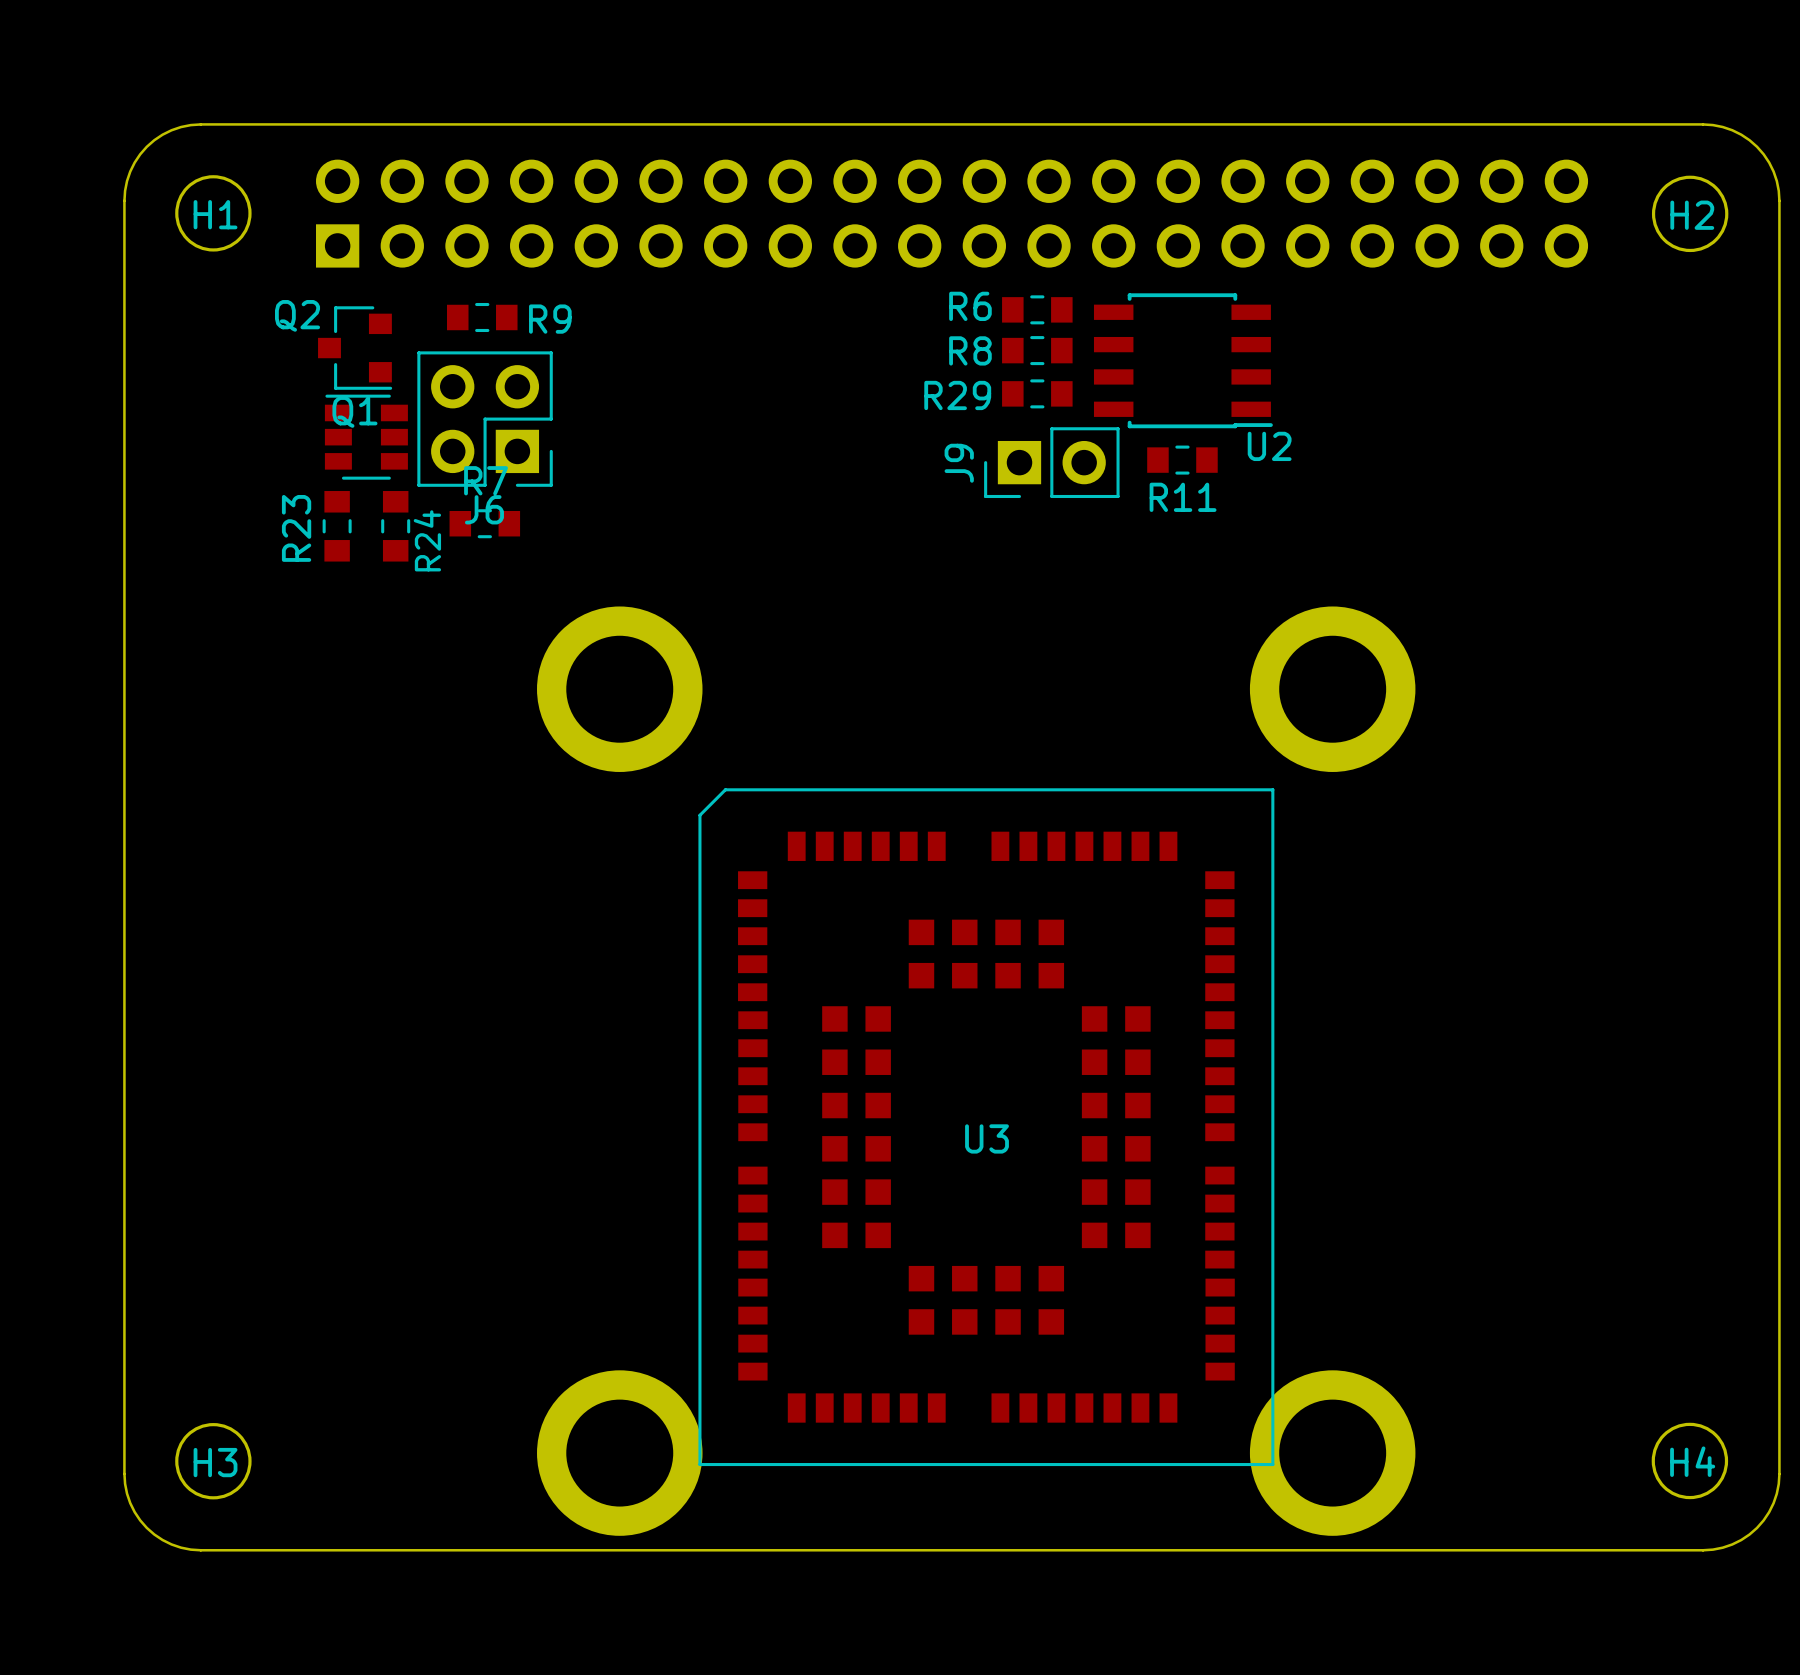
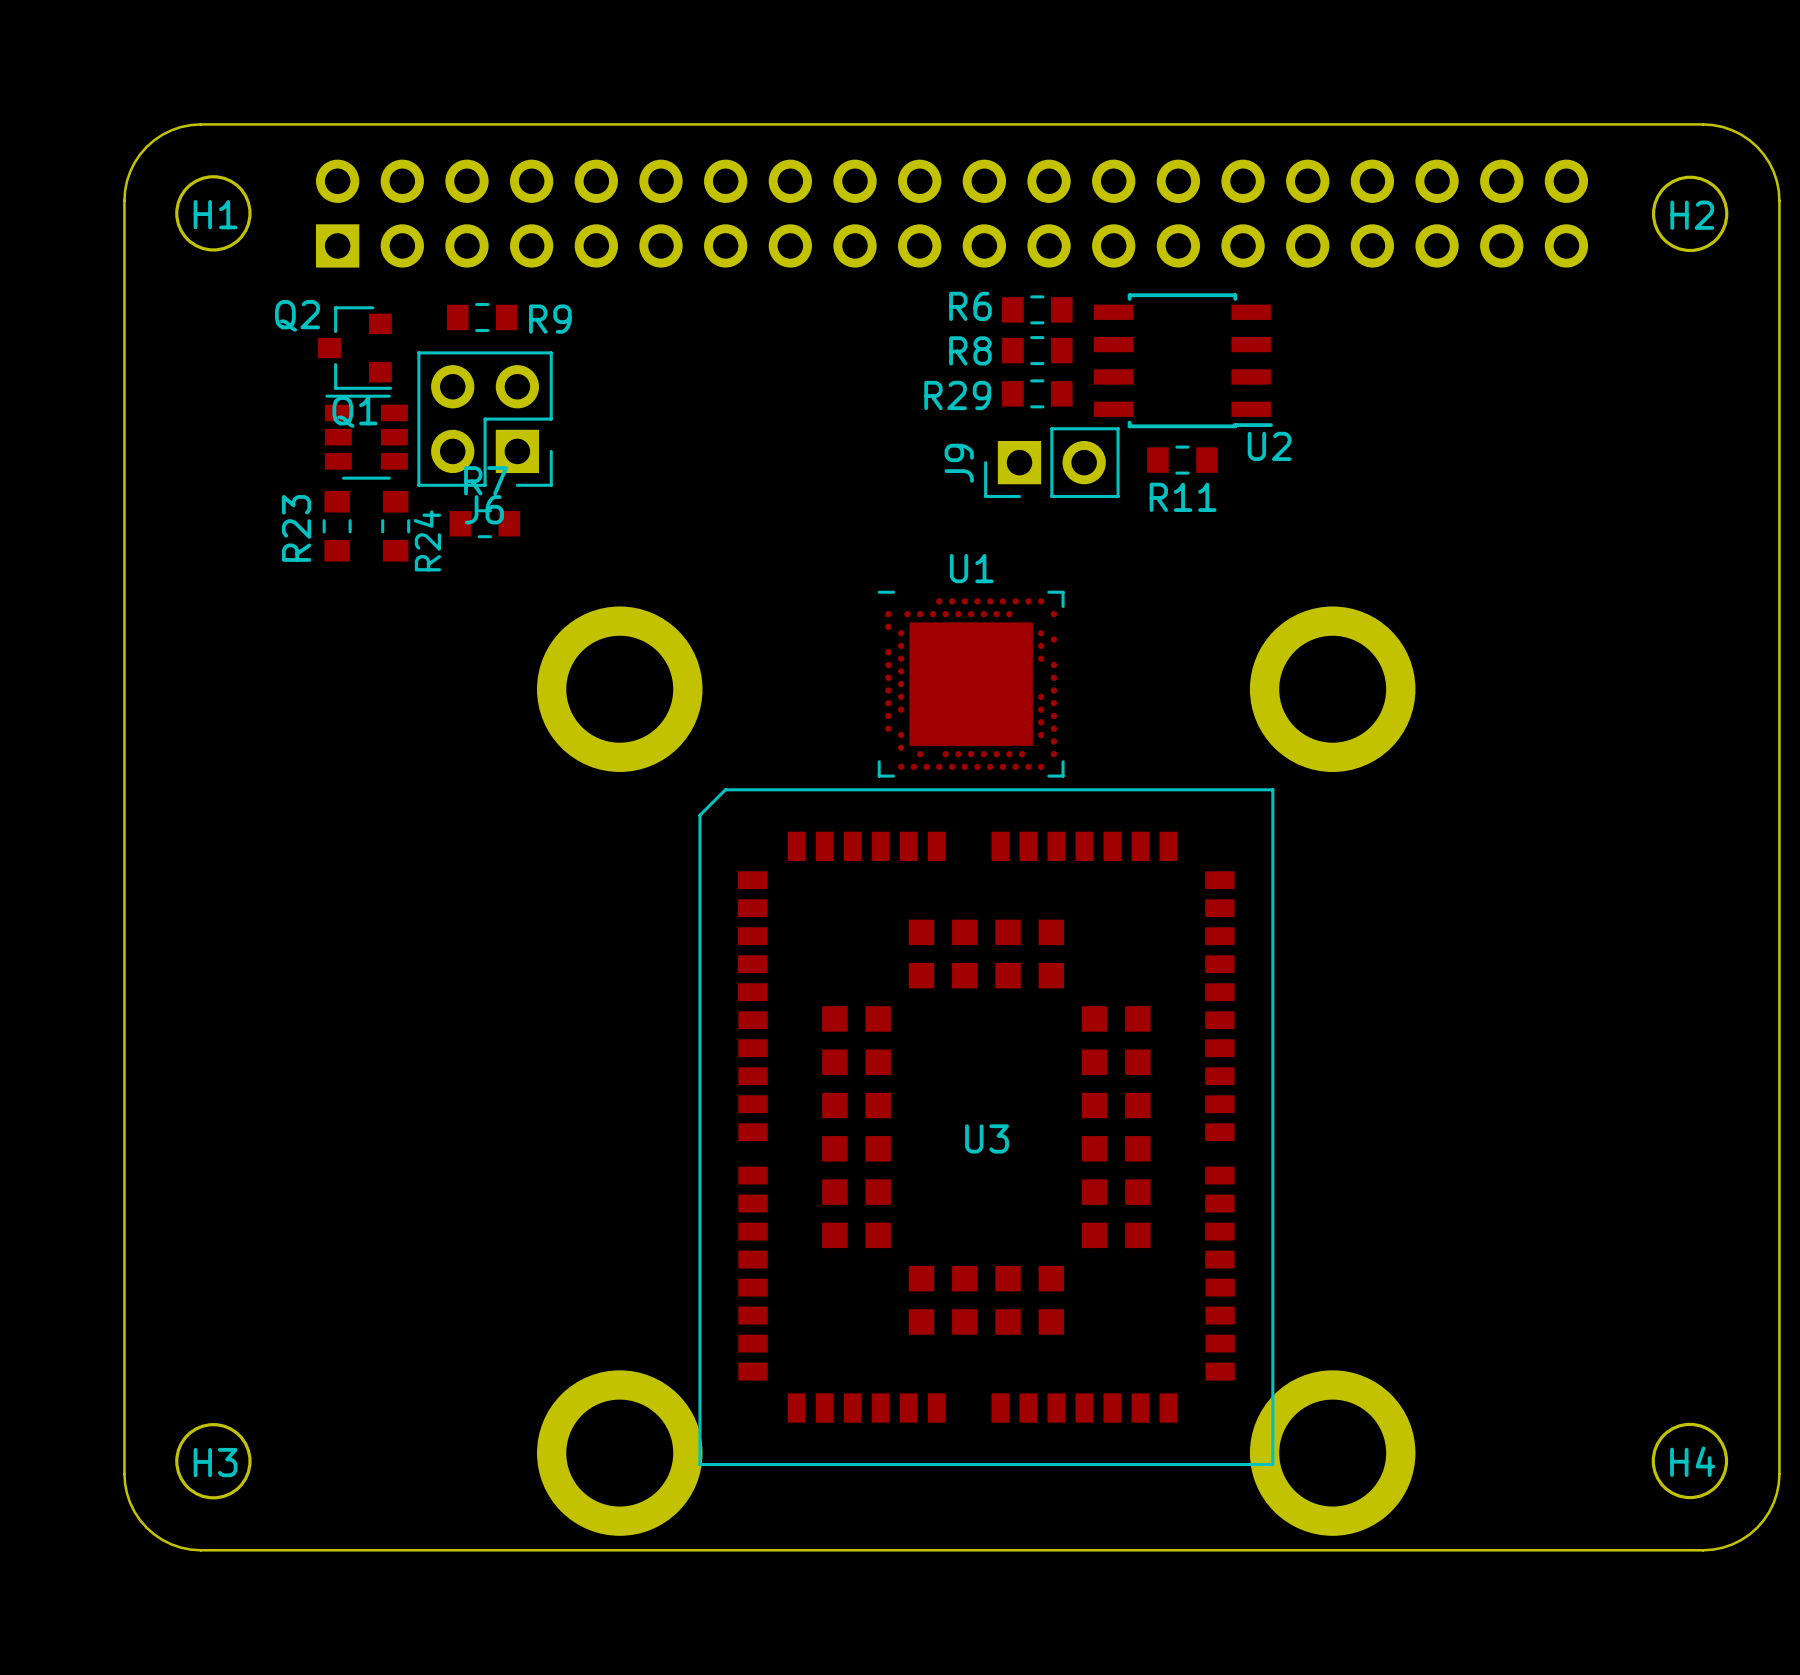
U1: none -> (971, 684)

